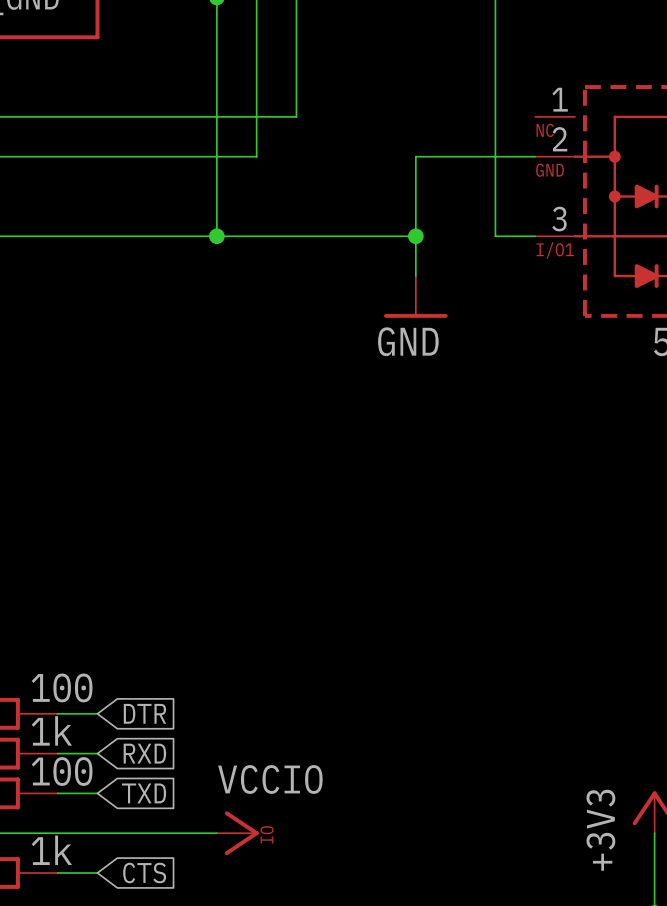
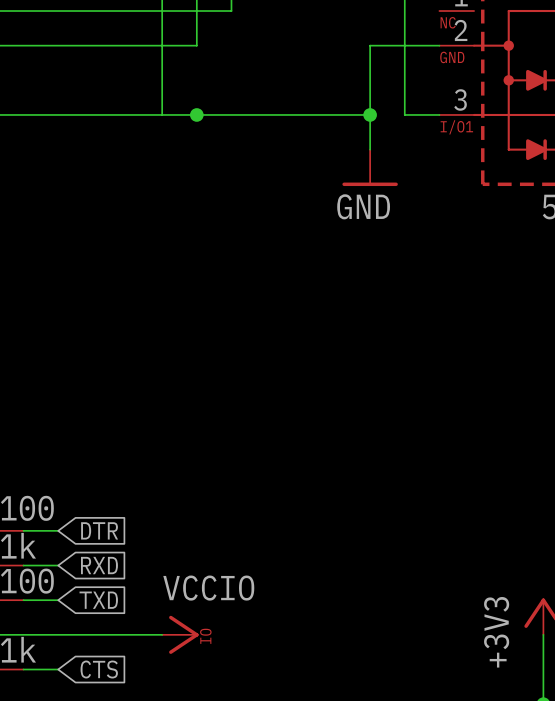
wire: (455, 156) (415, 156) (415, 276) -> (370, 45) (370, 149)
junction position: (216, 236) -> (196, 114)
wire: none -> (335, 114) (370, 114)
junction position: (415, 236) -> (370, 114)
power symbol position: GND (415, 296) -> GND (370, 167)

